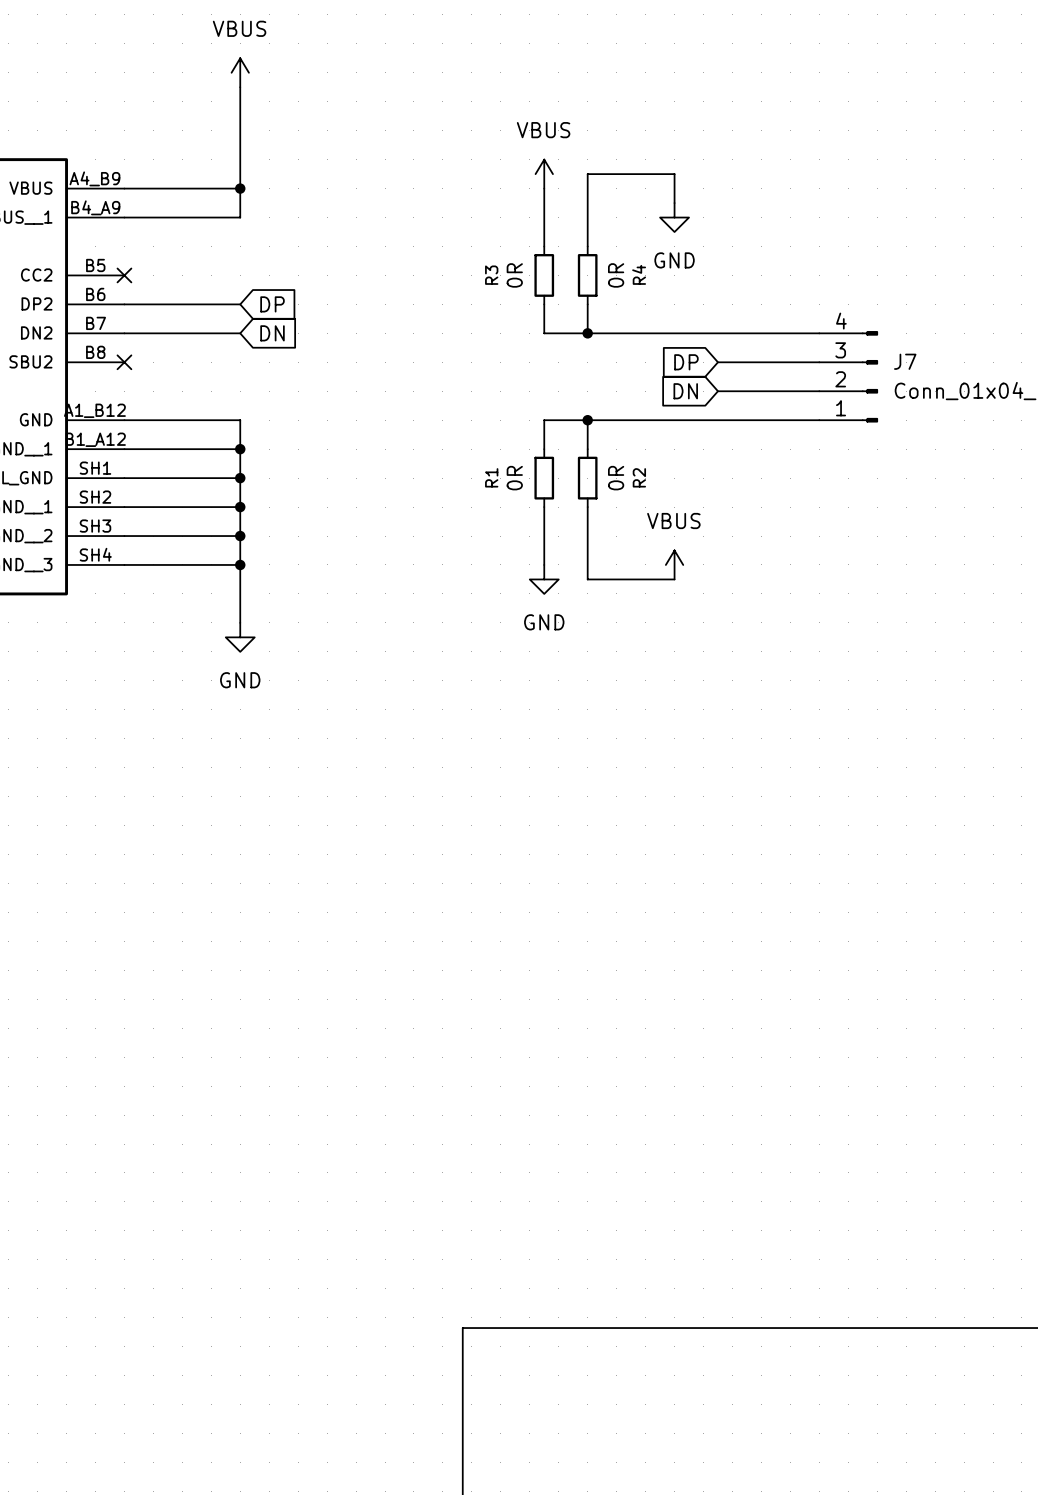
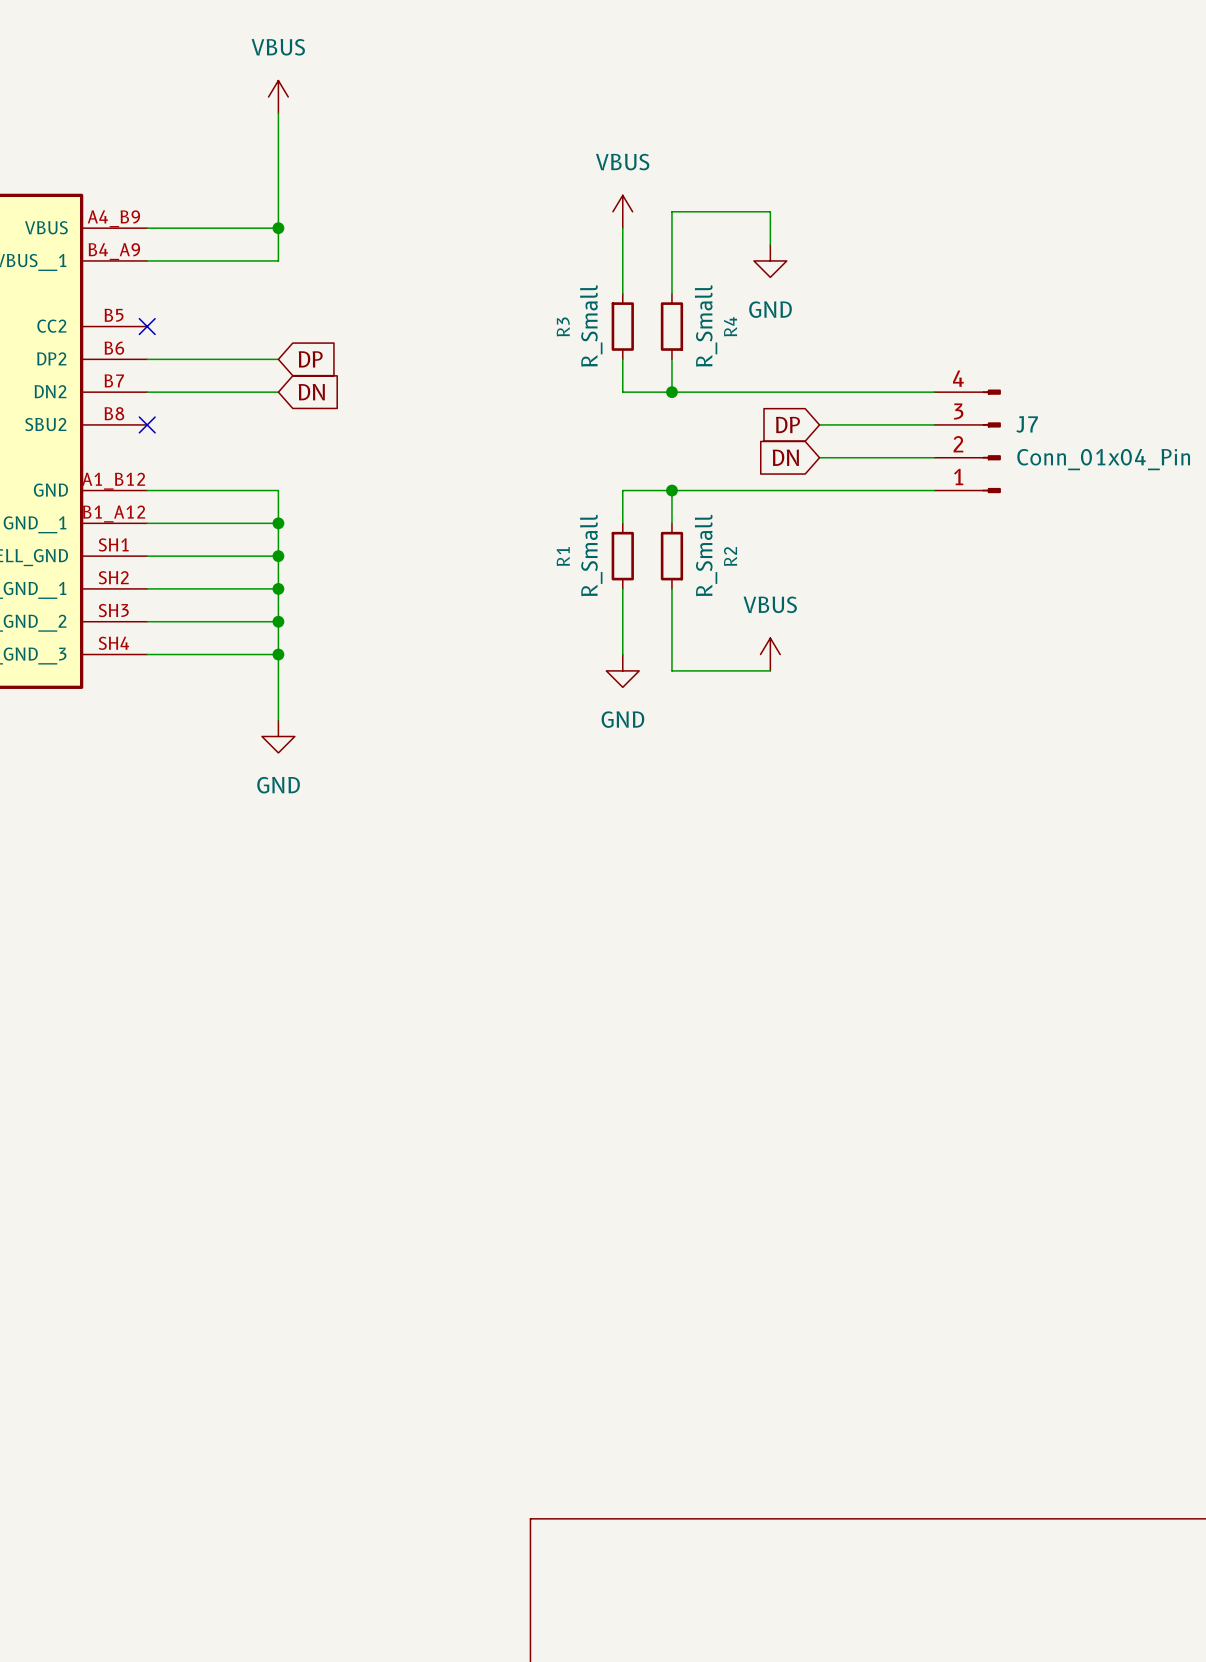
R3 value: 0R (514, 275) -> R_Small (591, 325)
R4 value: 0R (616, 275) -> R_Small (706, 325)
R1 value: 0R (514, 478) -> R_Small (591, 555)
R2 value: 0R (616, 478) -> R_Small (706, 555)

